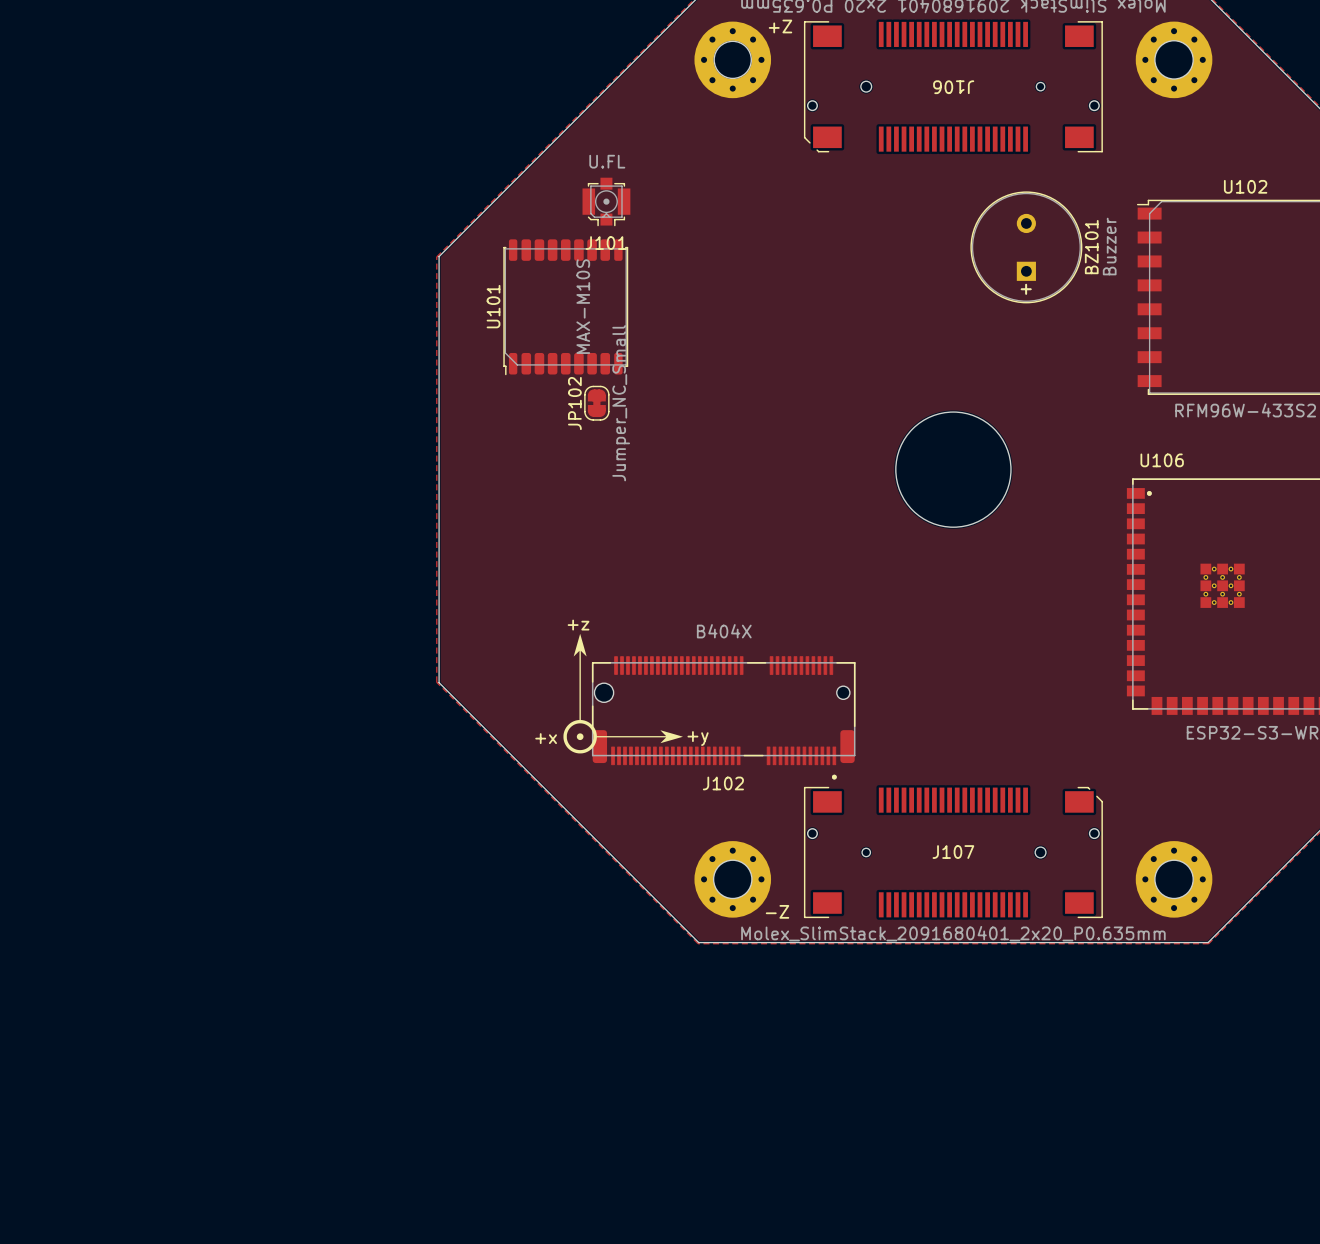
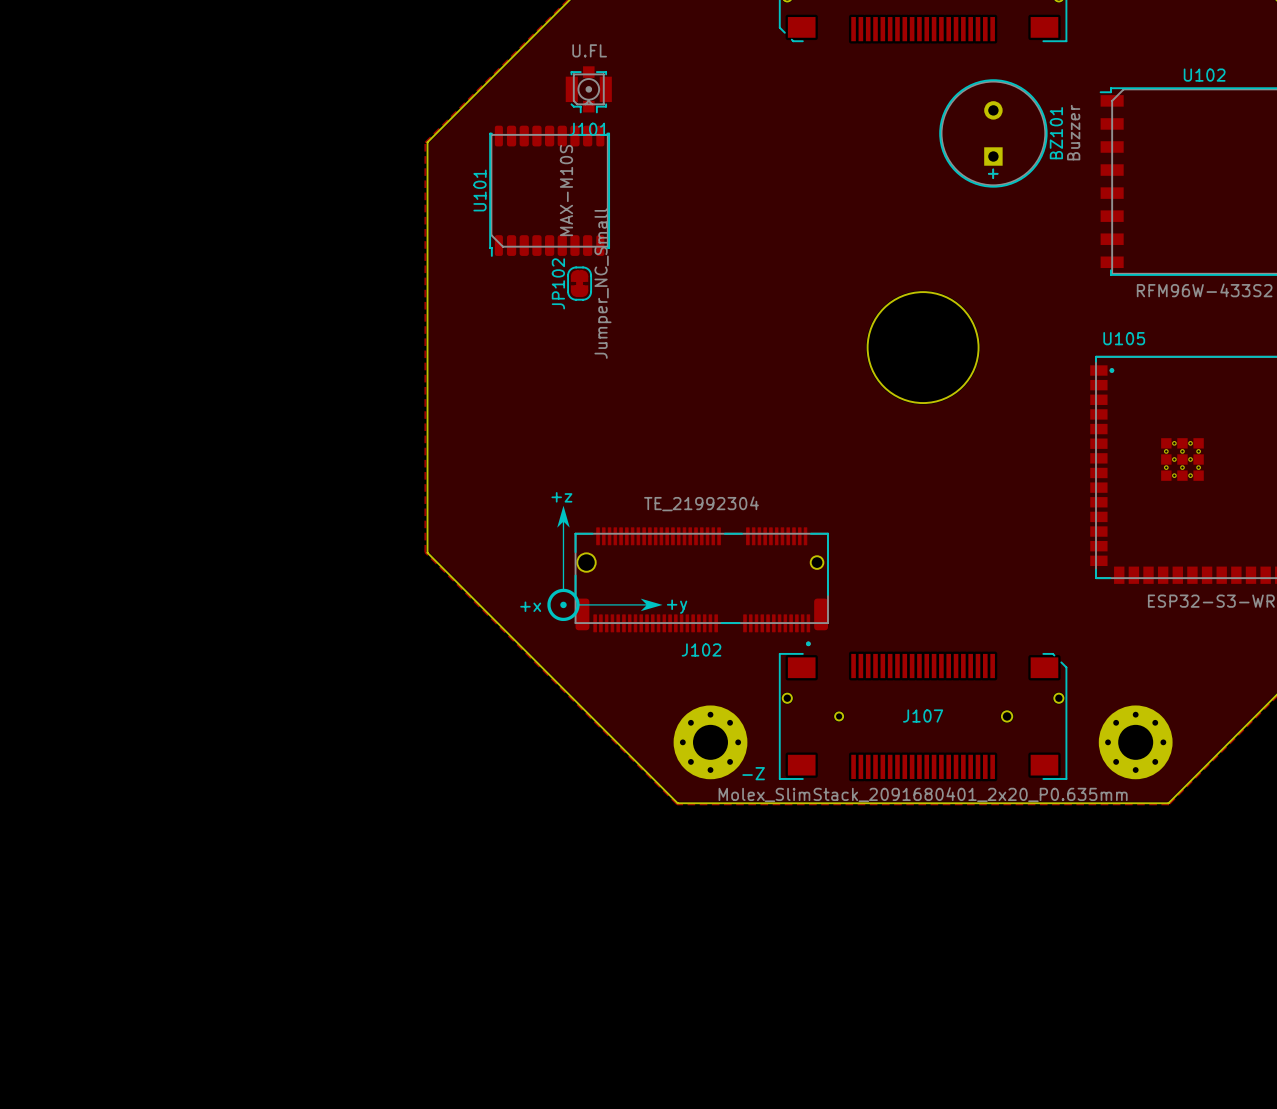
U106 name: U106 (1162, 460) -> U105 (1124, 338)
J102 value: B404X (724, 631) -> TE_21992304 (701, 503)

